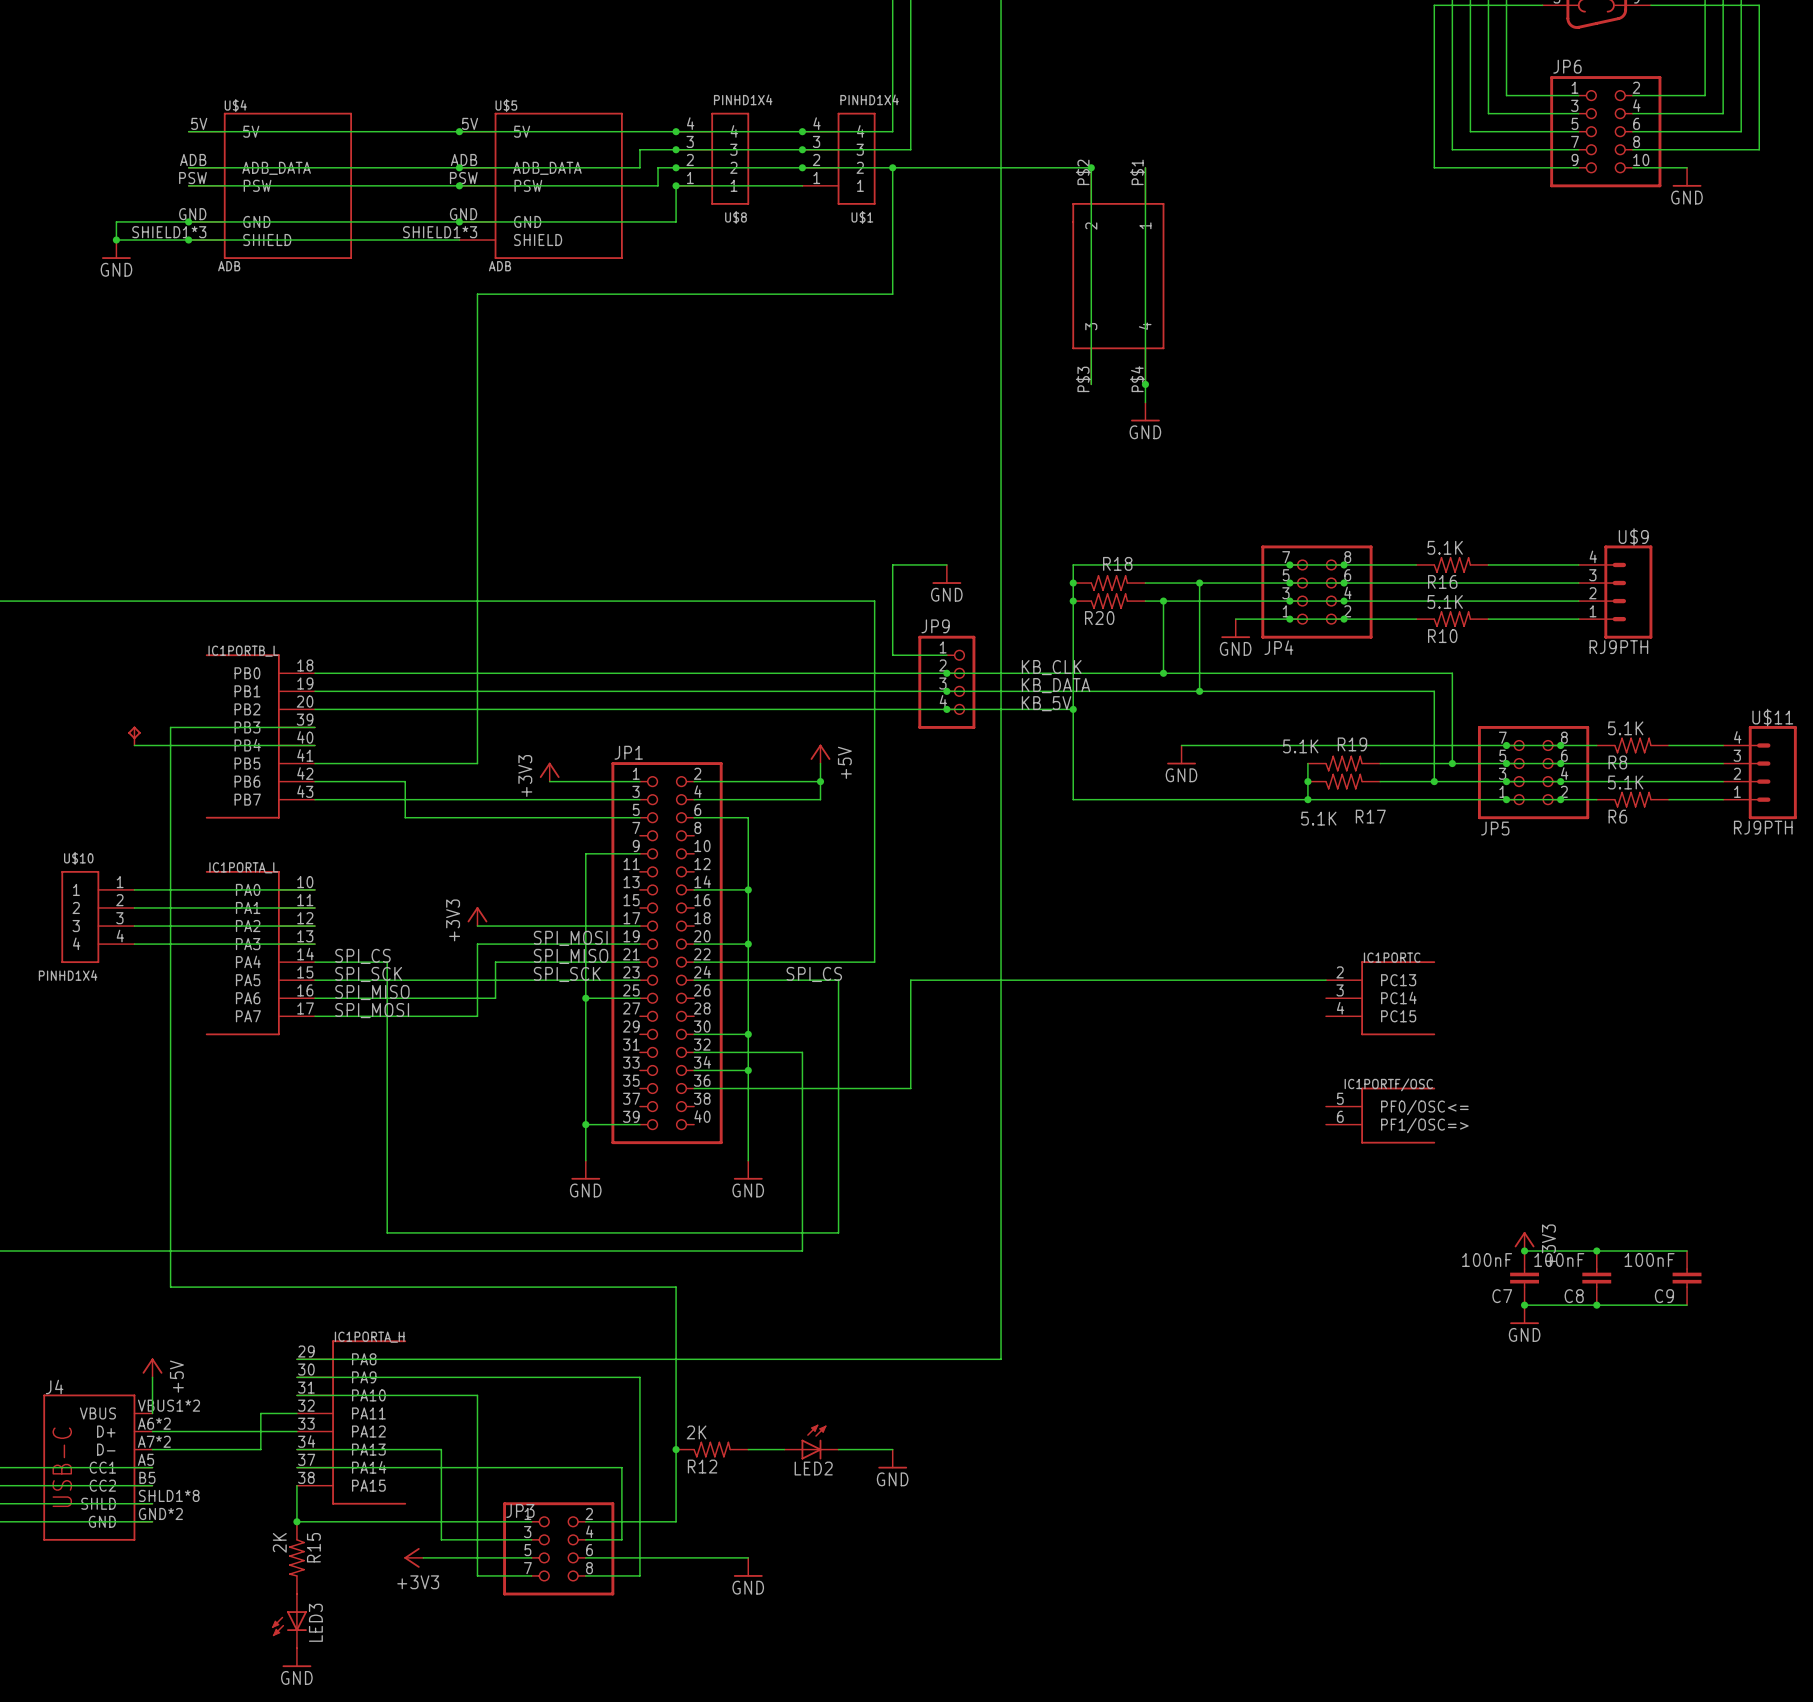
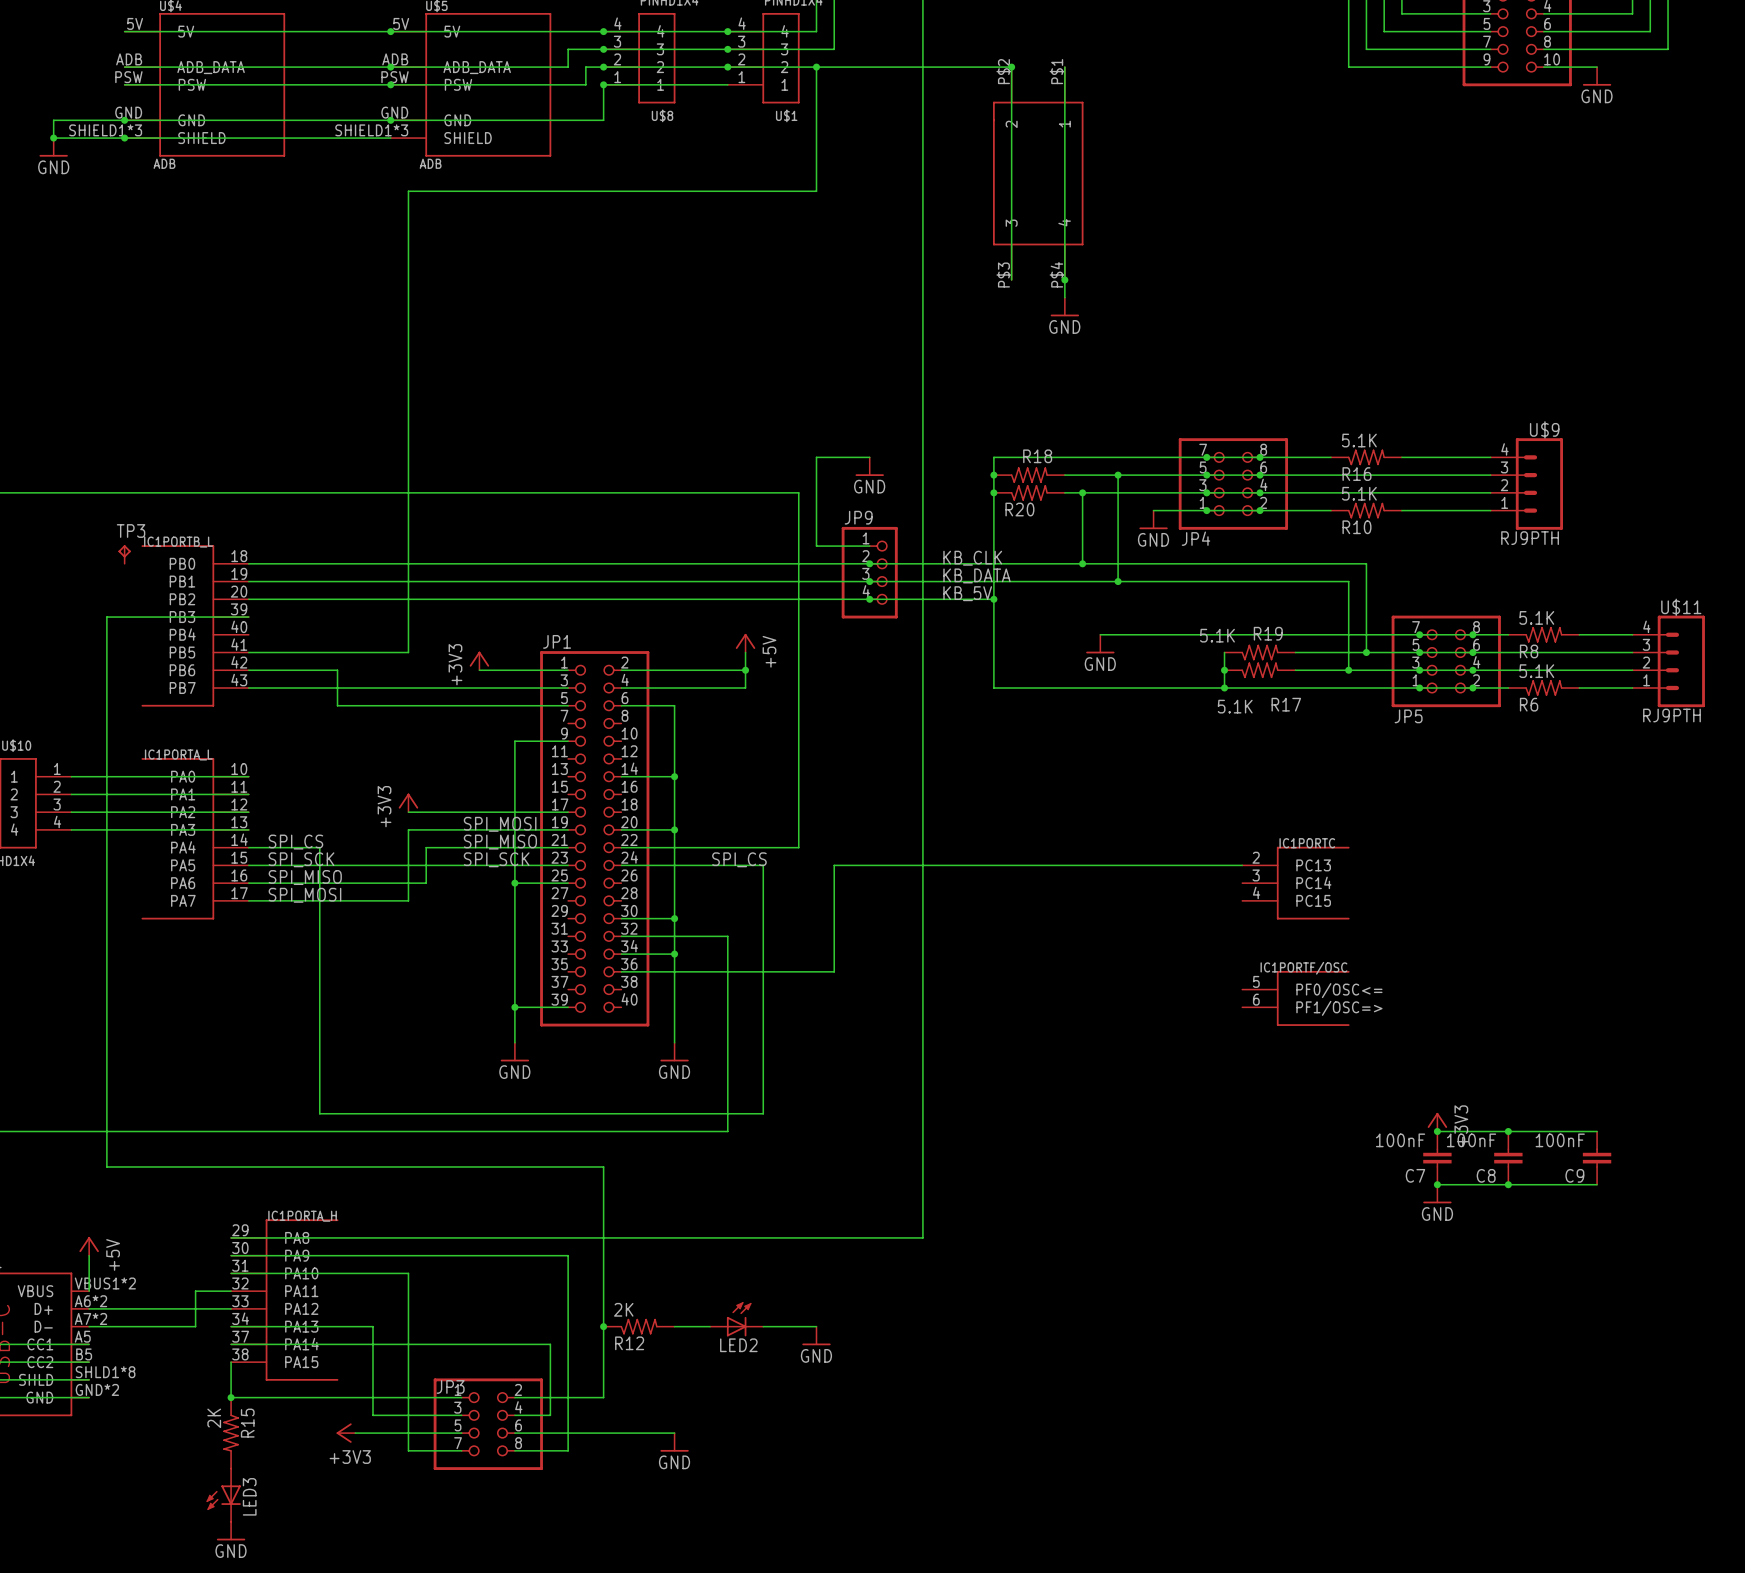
TP3: none -> (124, 554)
part: (134, 736) -> none
wire: (134, 745) (314, 745) -> none

